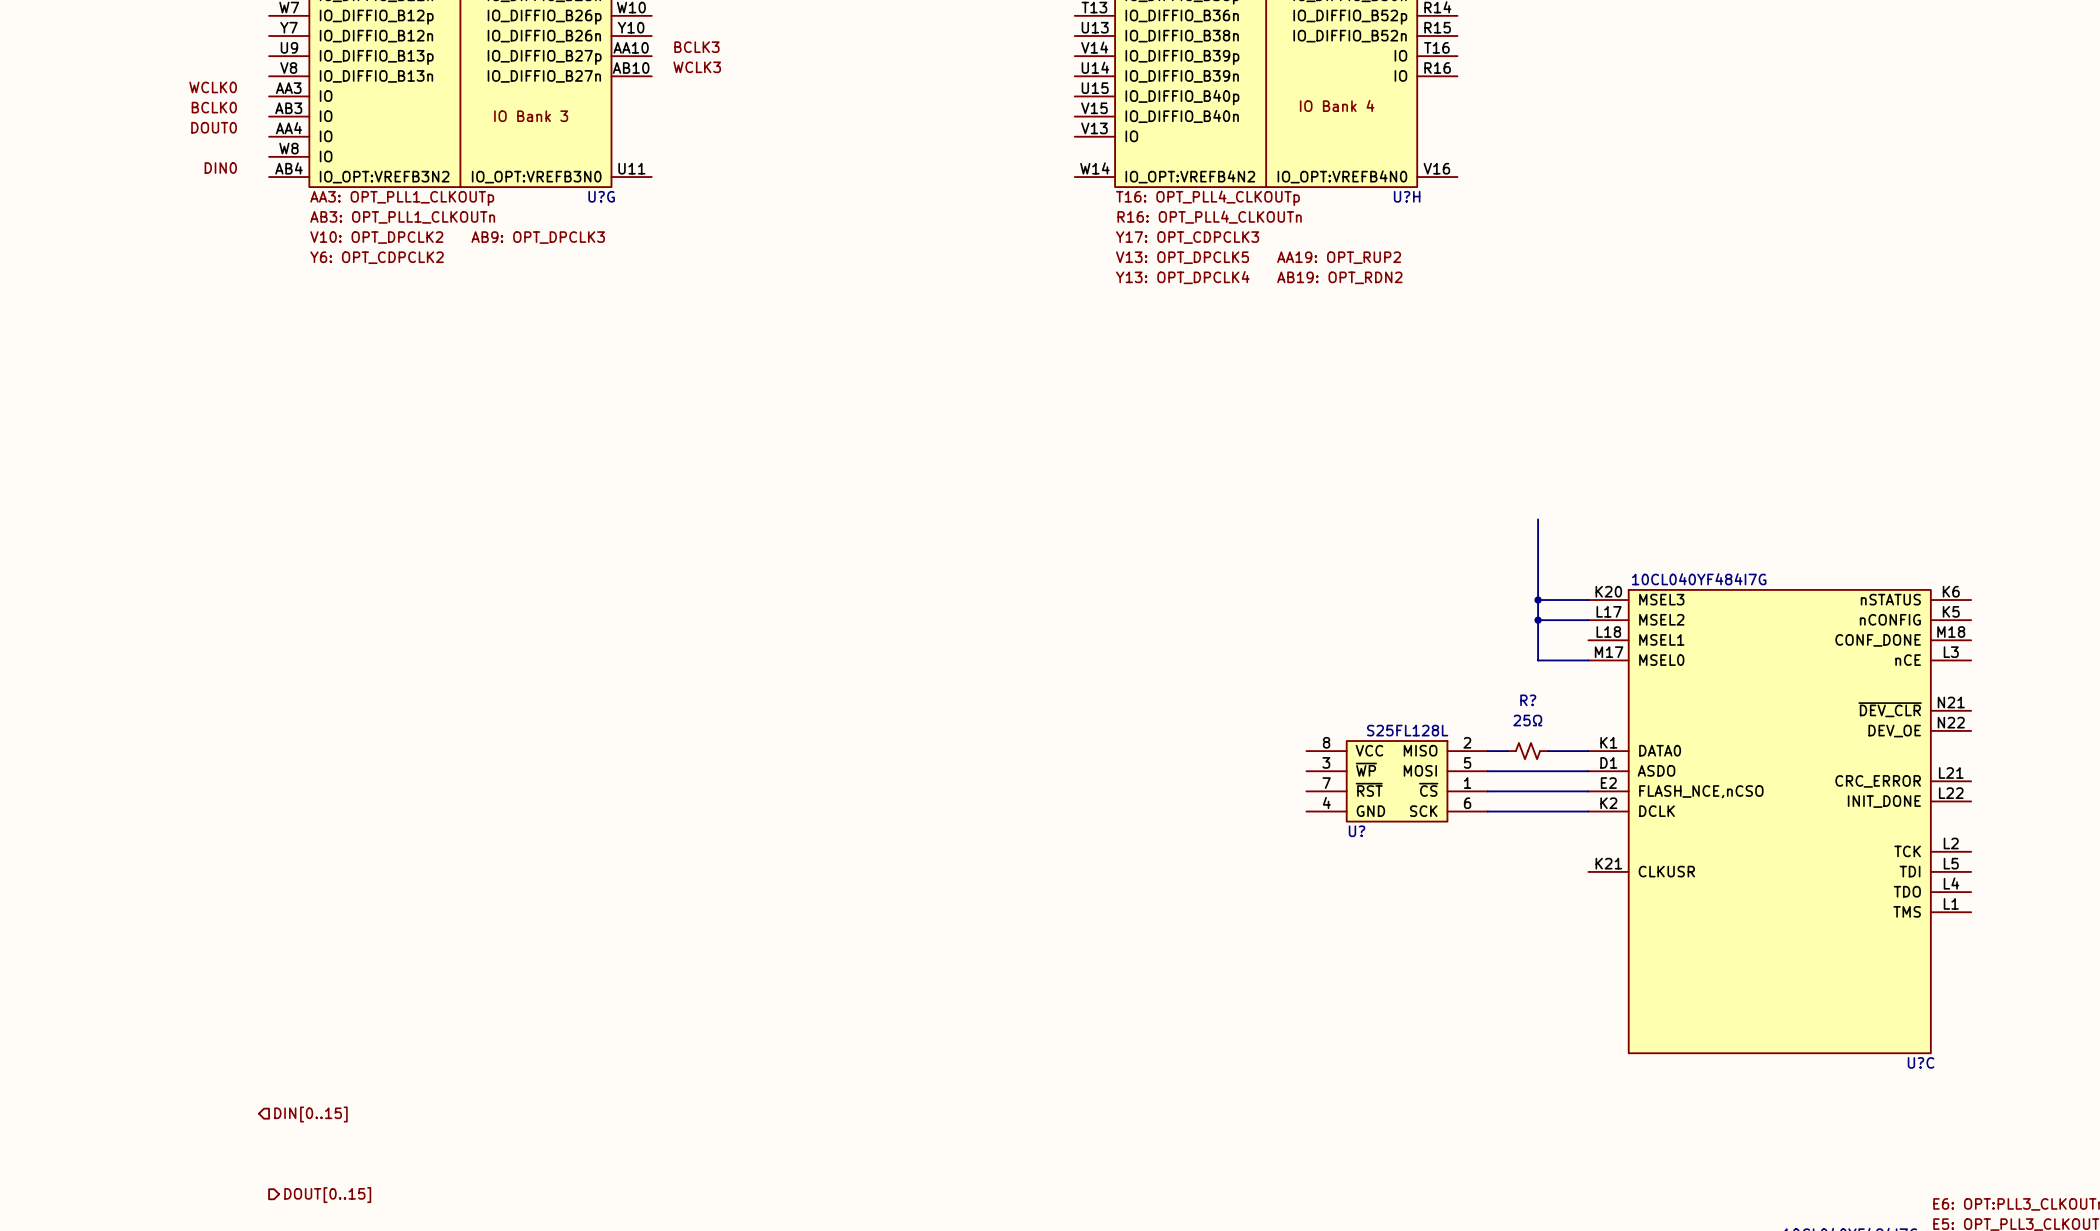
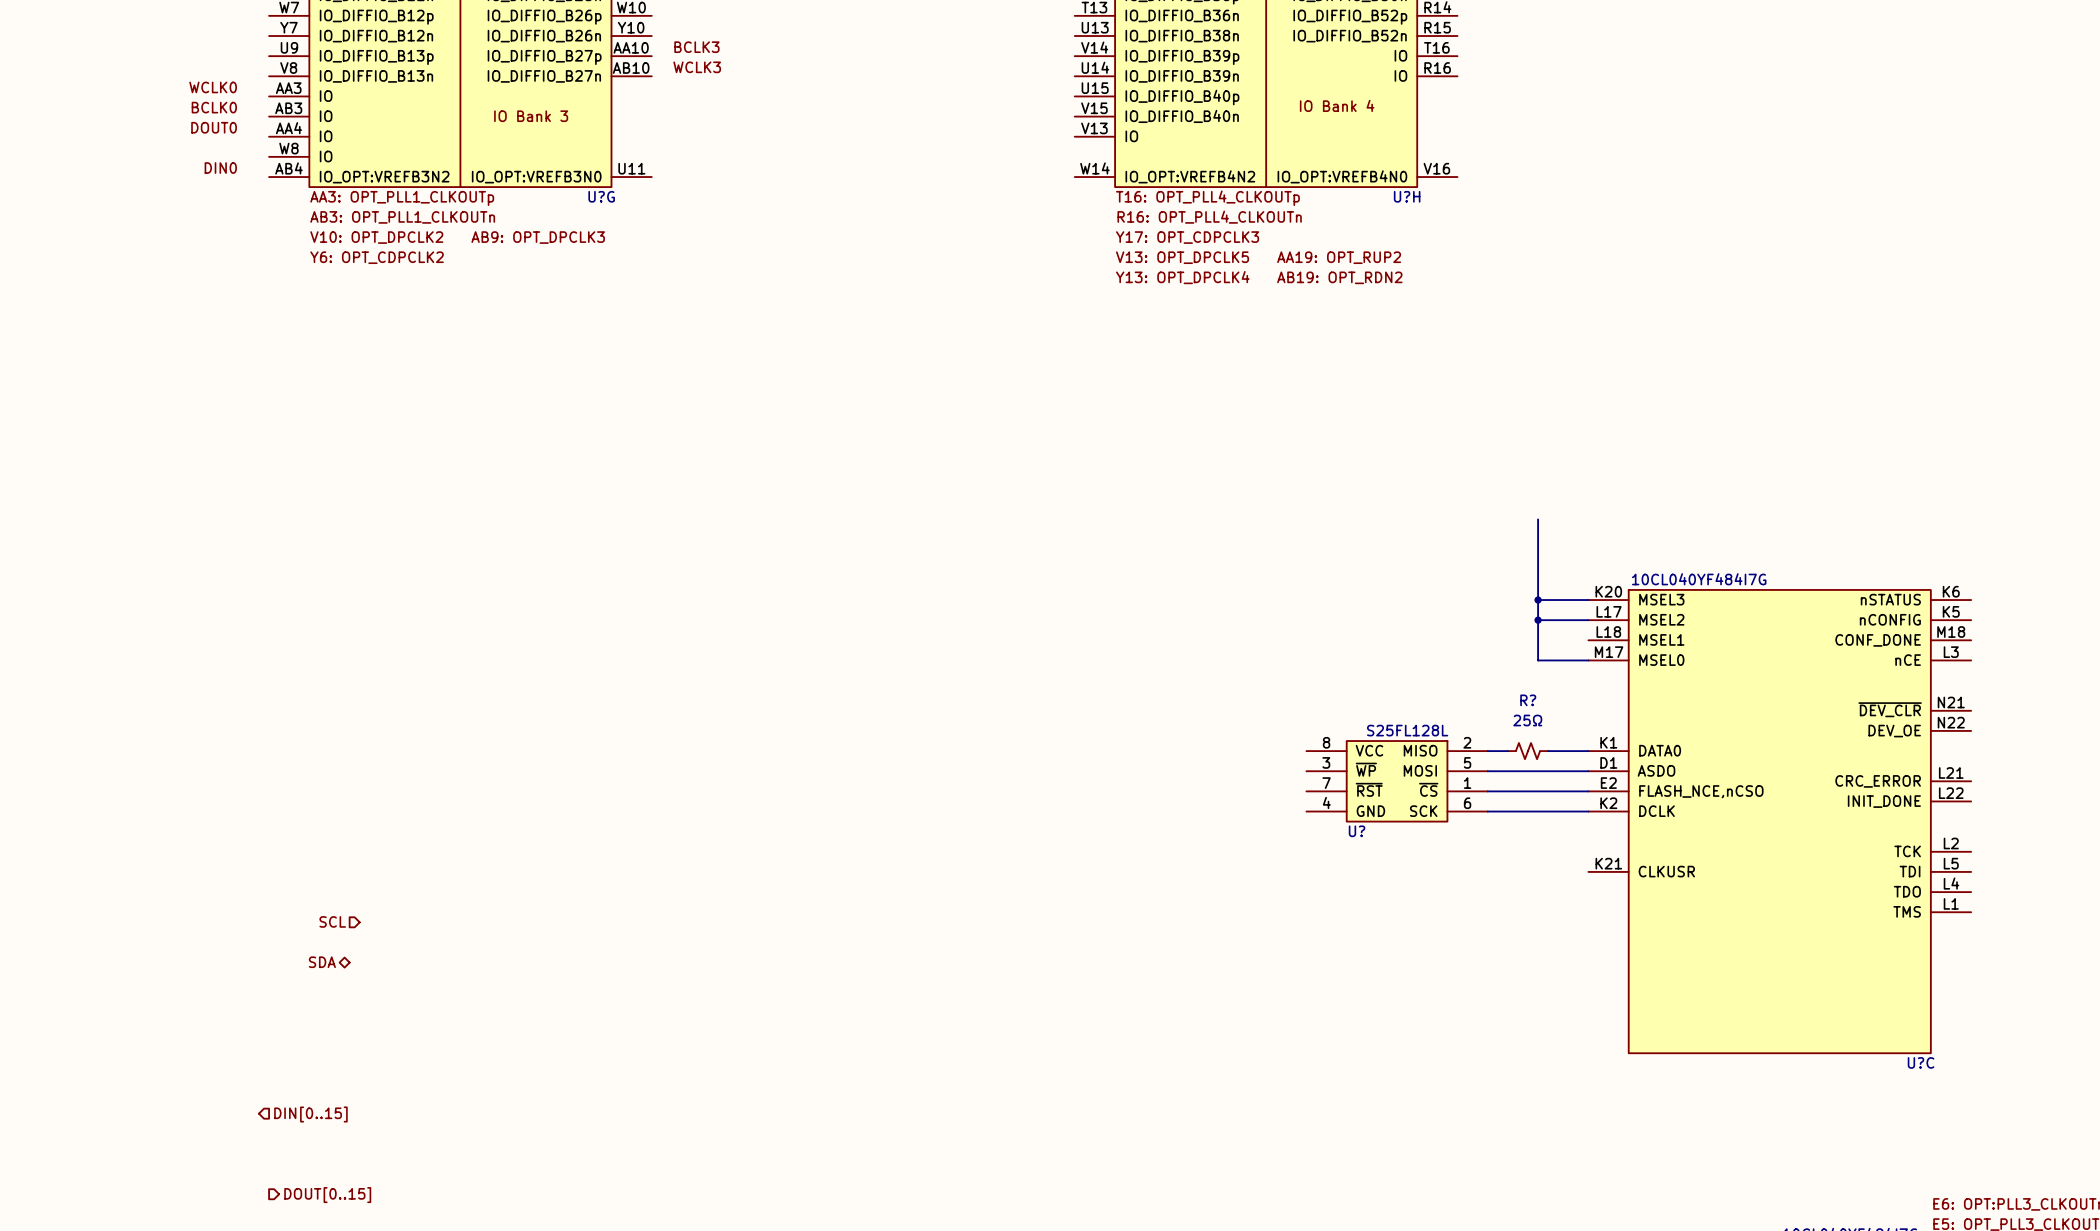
hierarchical label: none -> SCL (332, 921)
hierarchical label: none -> SDA (322, 962)

